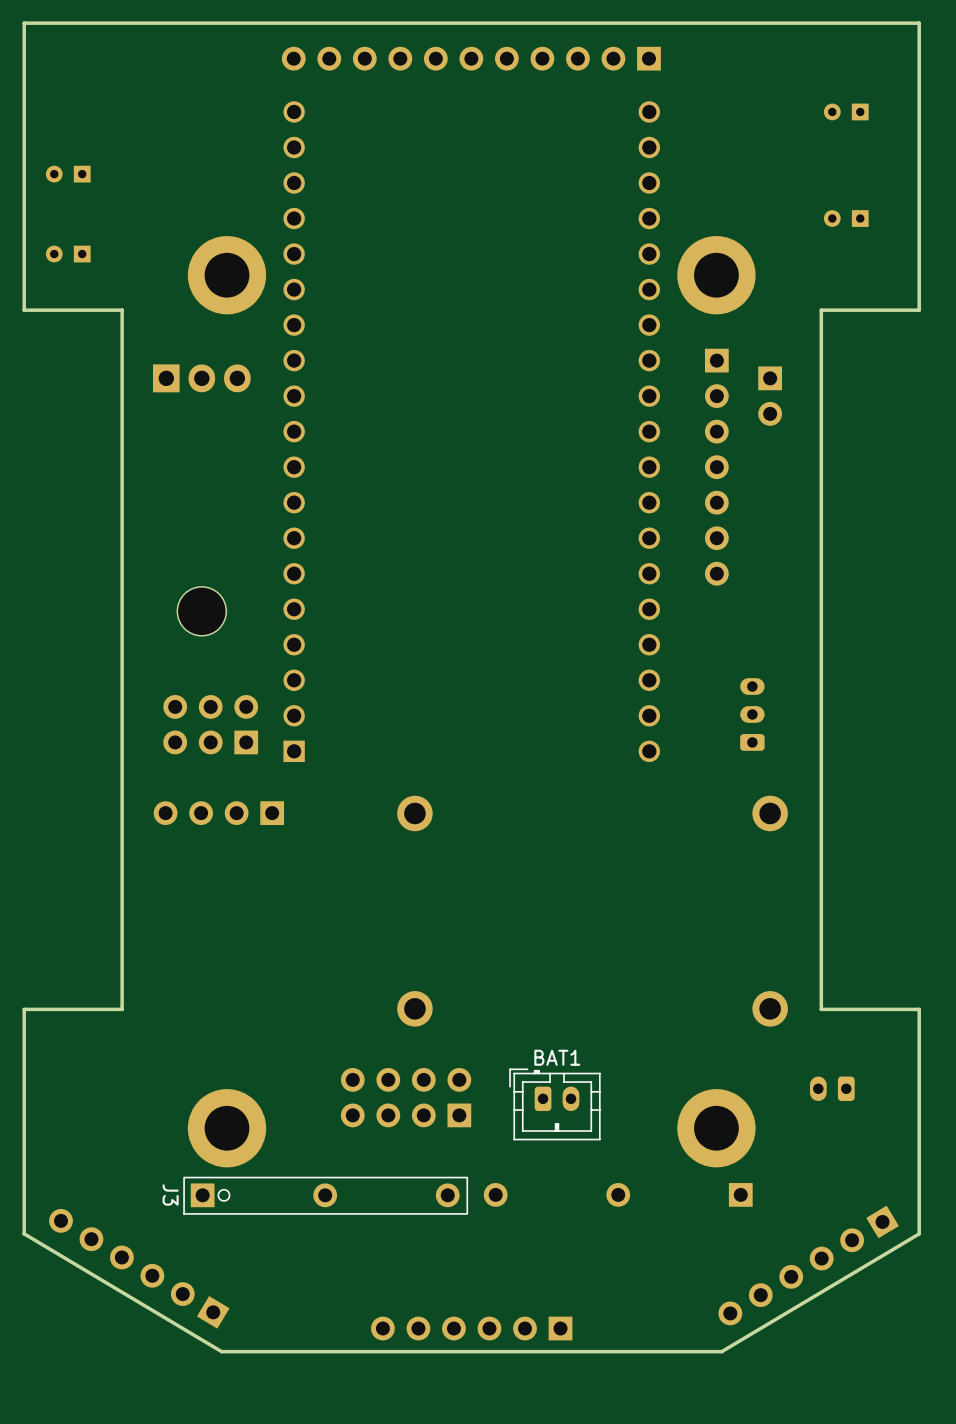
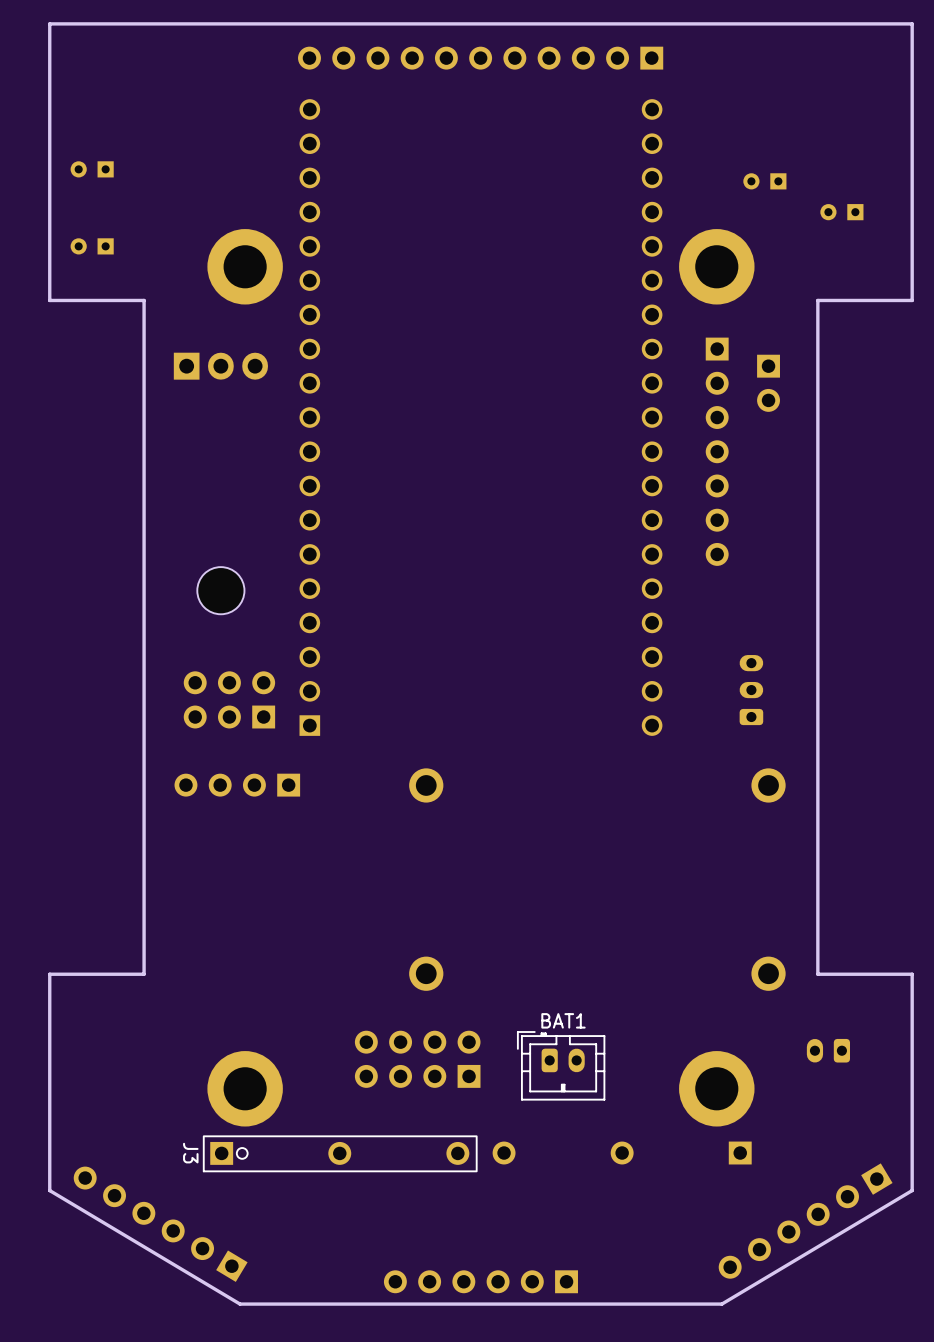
part position: (846, 111) -> (764, 181)

